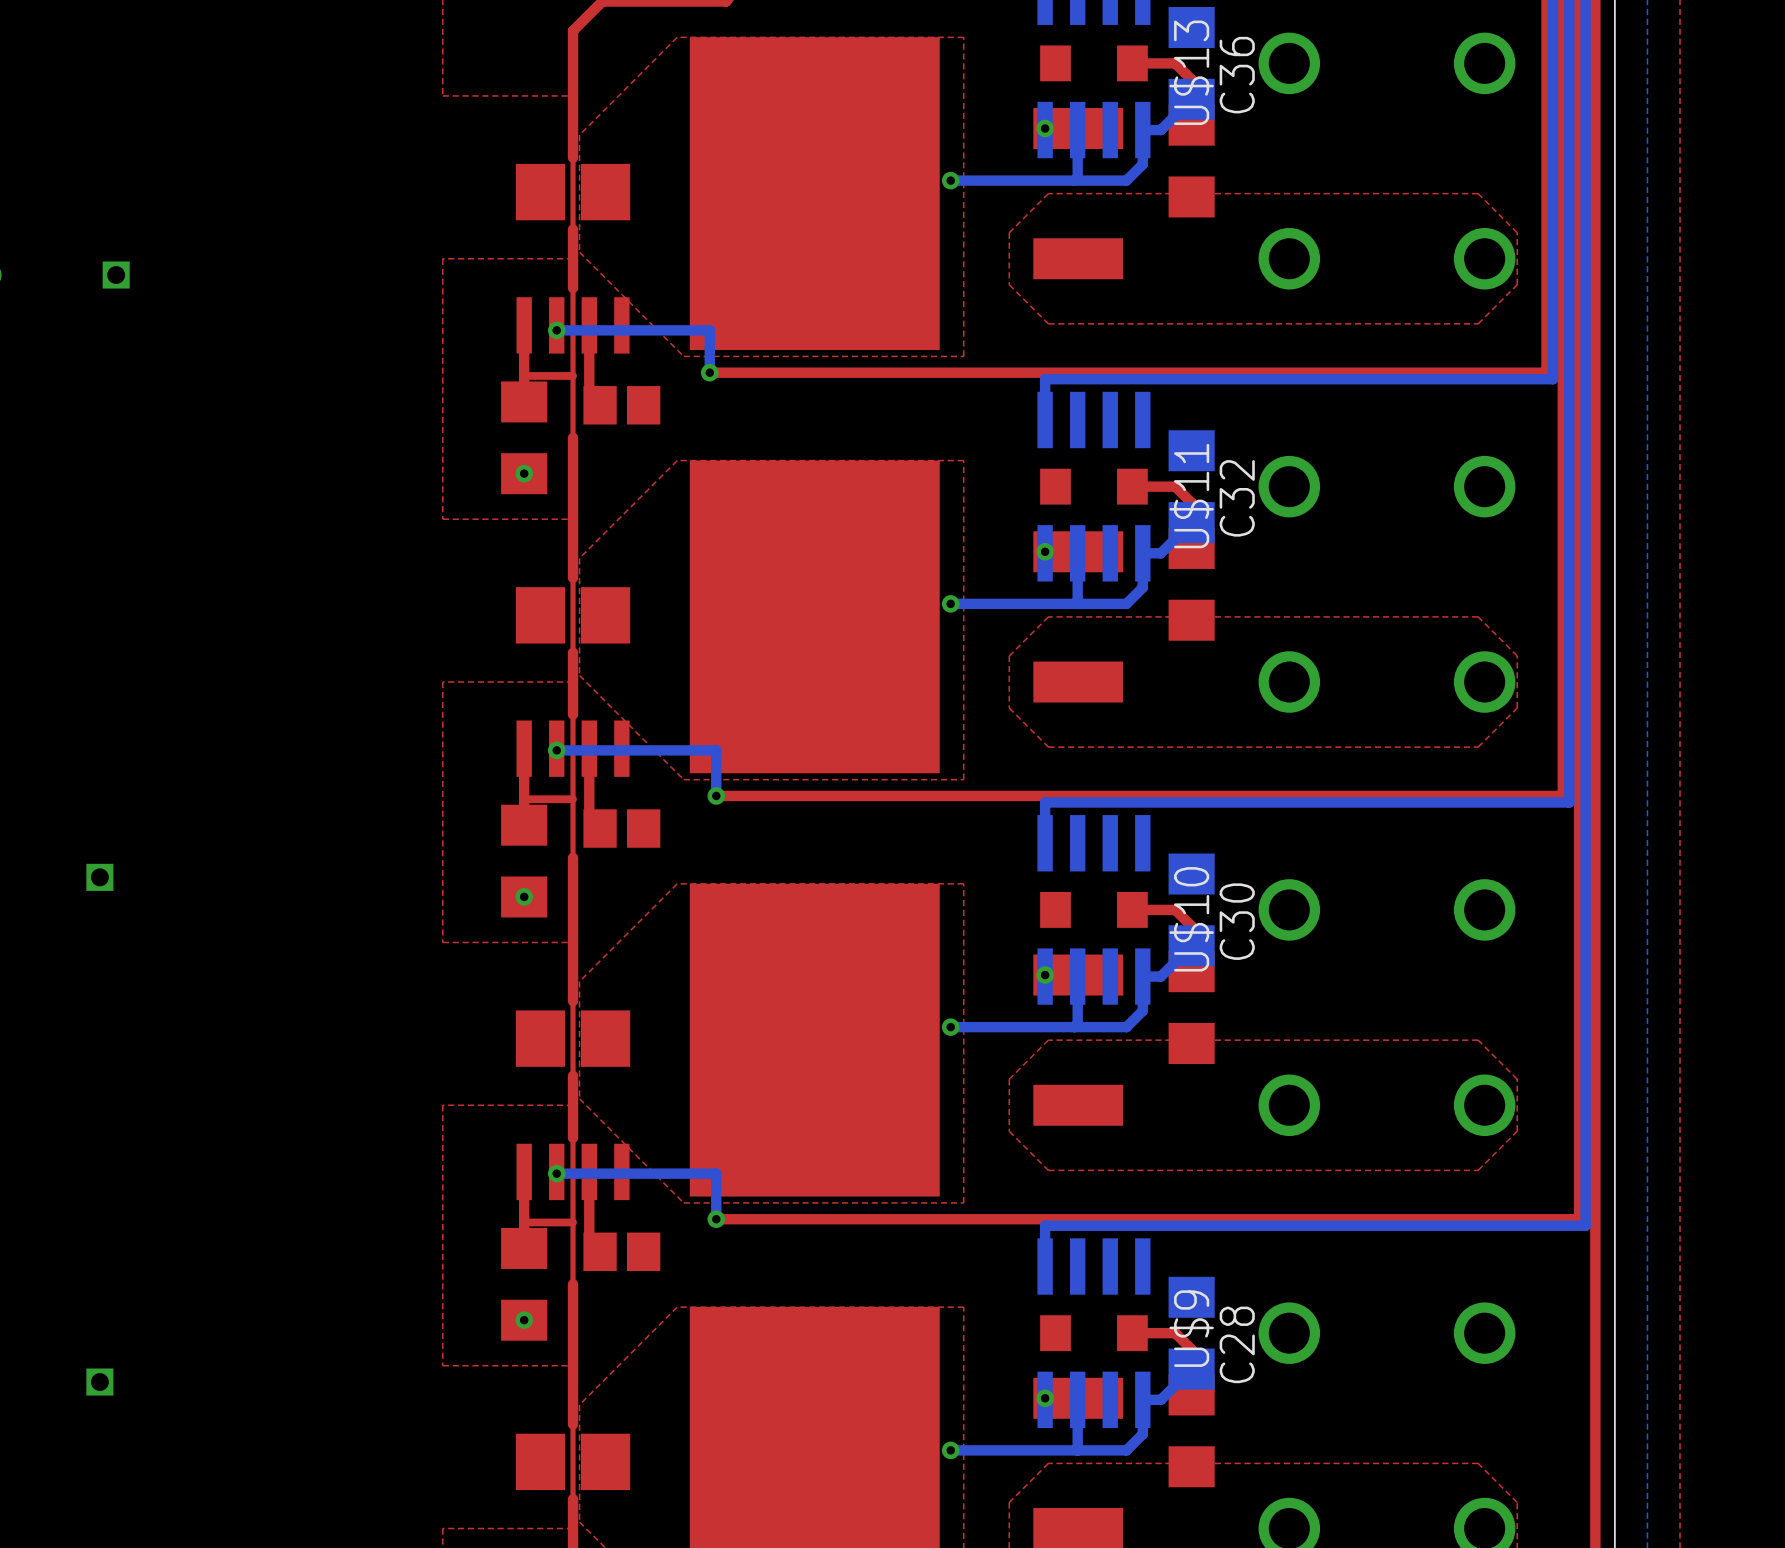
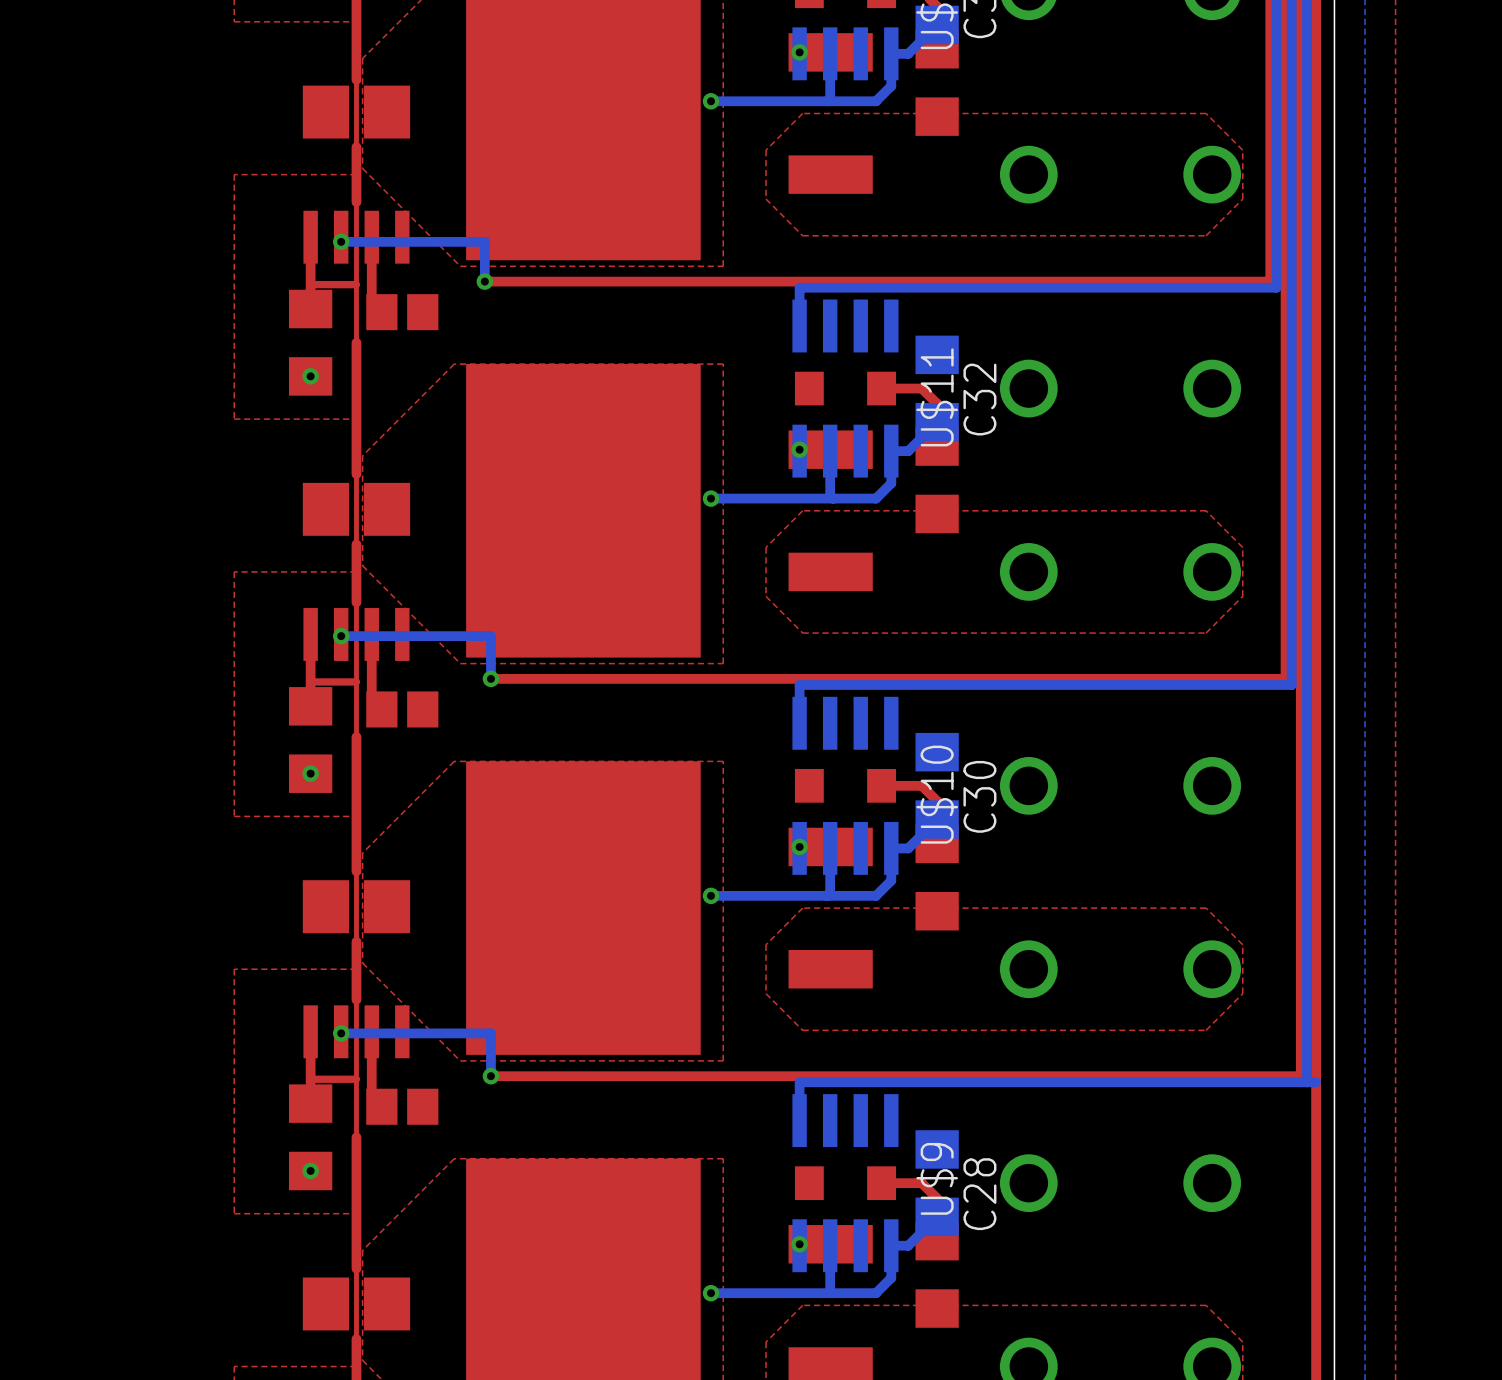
bottom track: none -> (1316, 1082) (1306, 1082)

